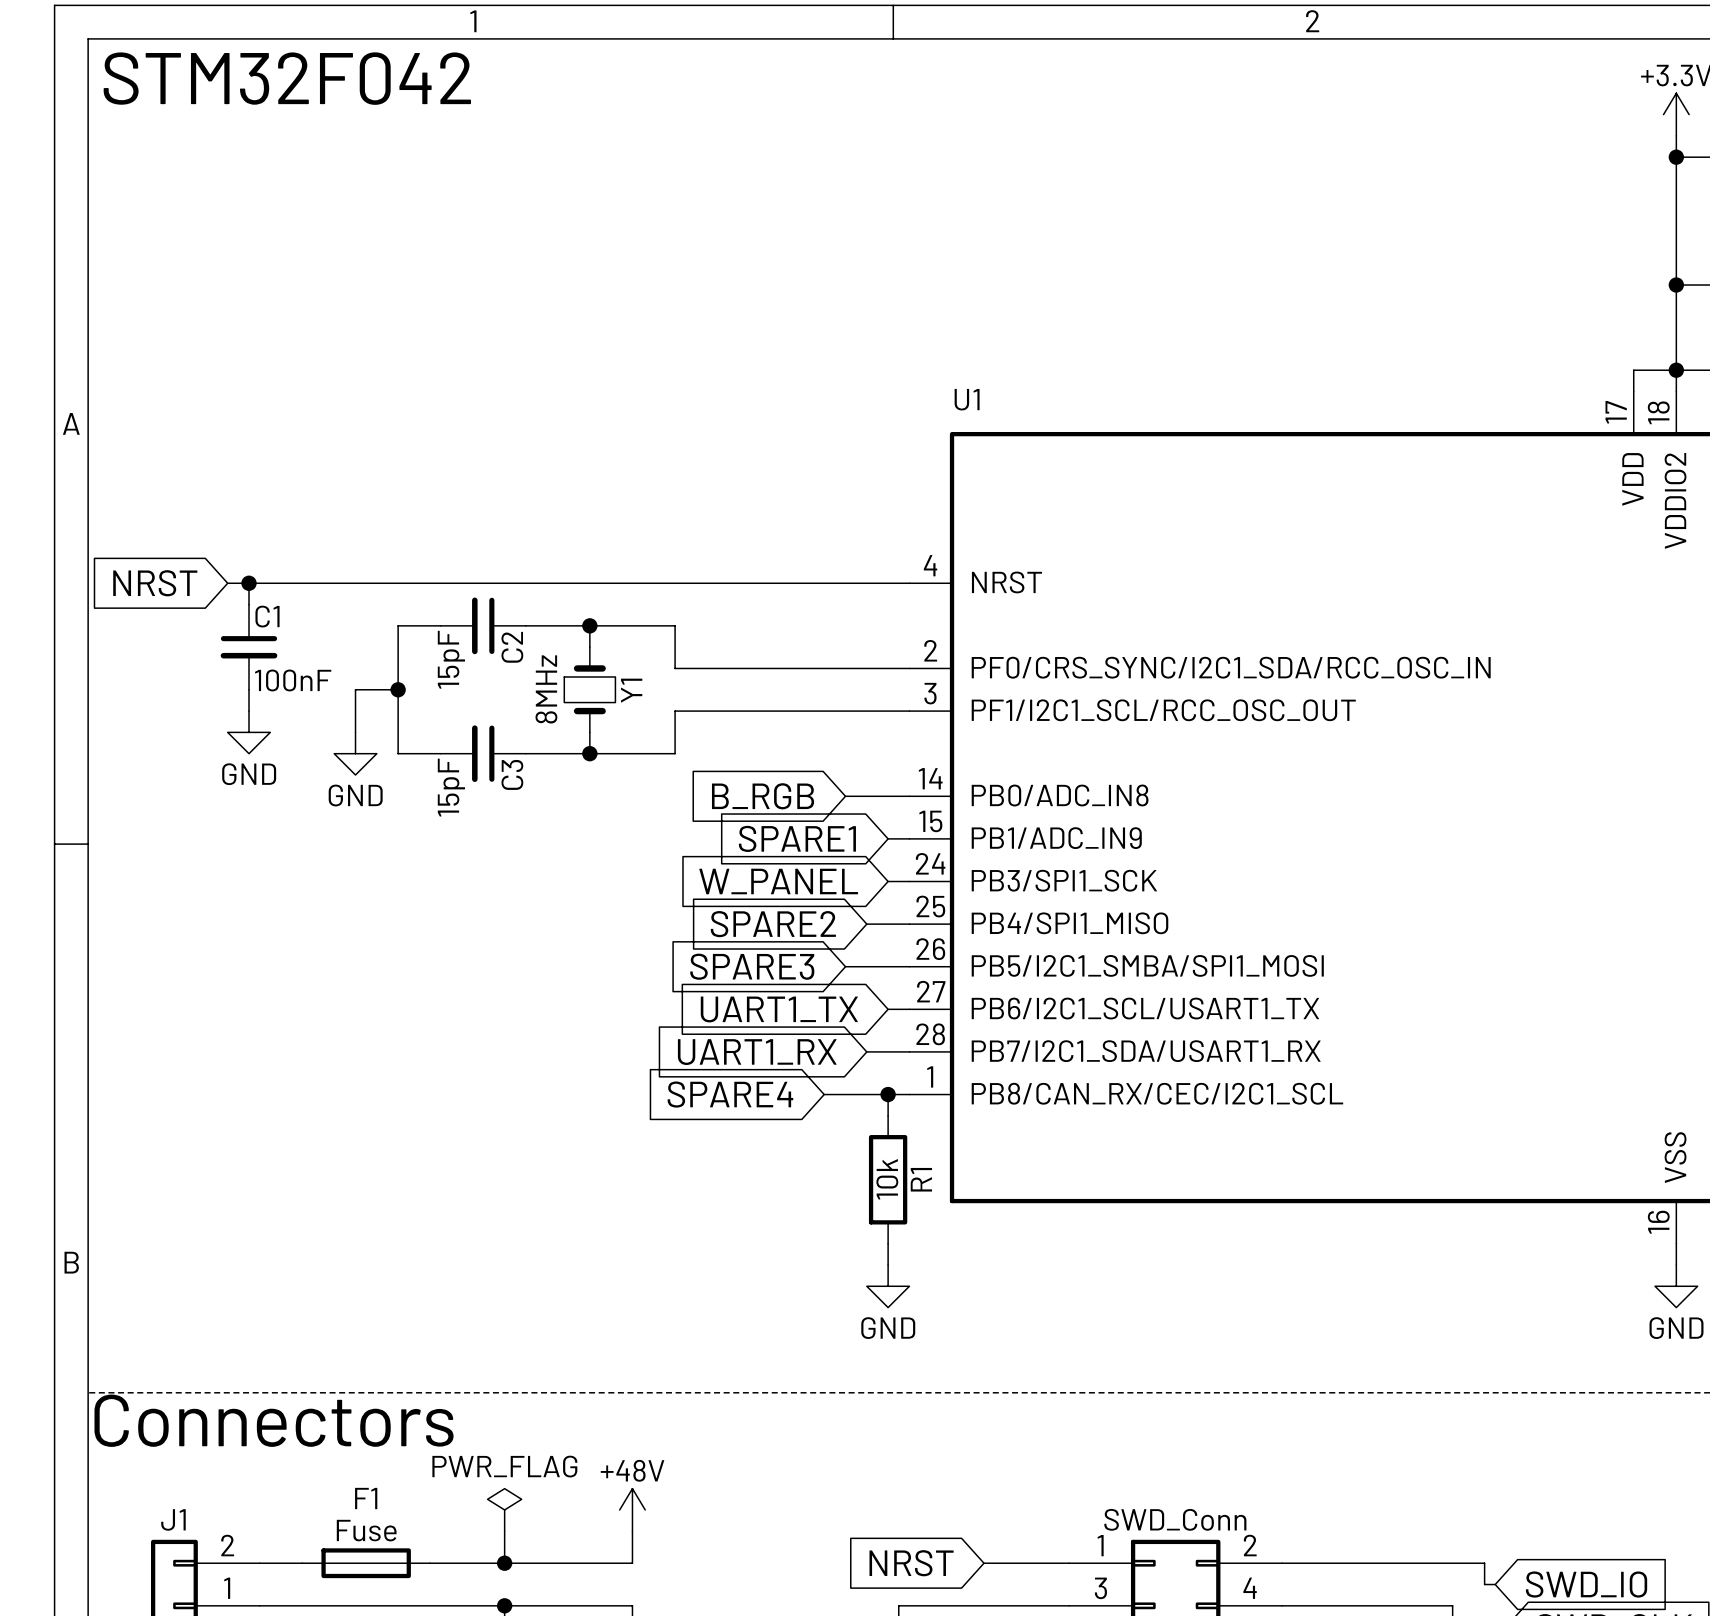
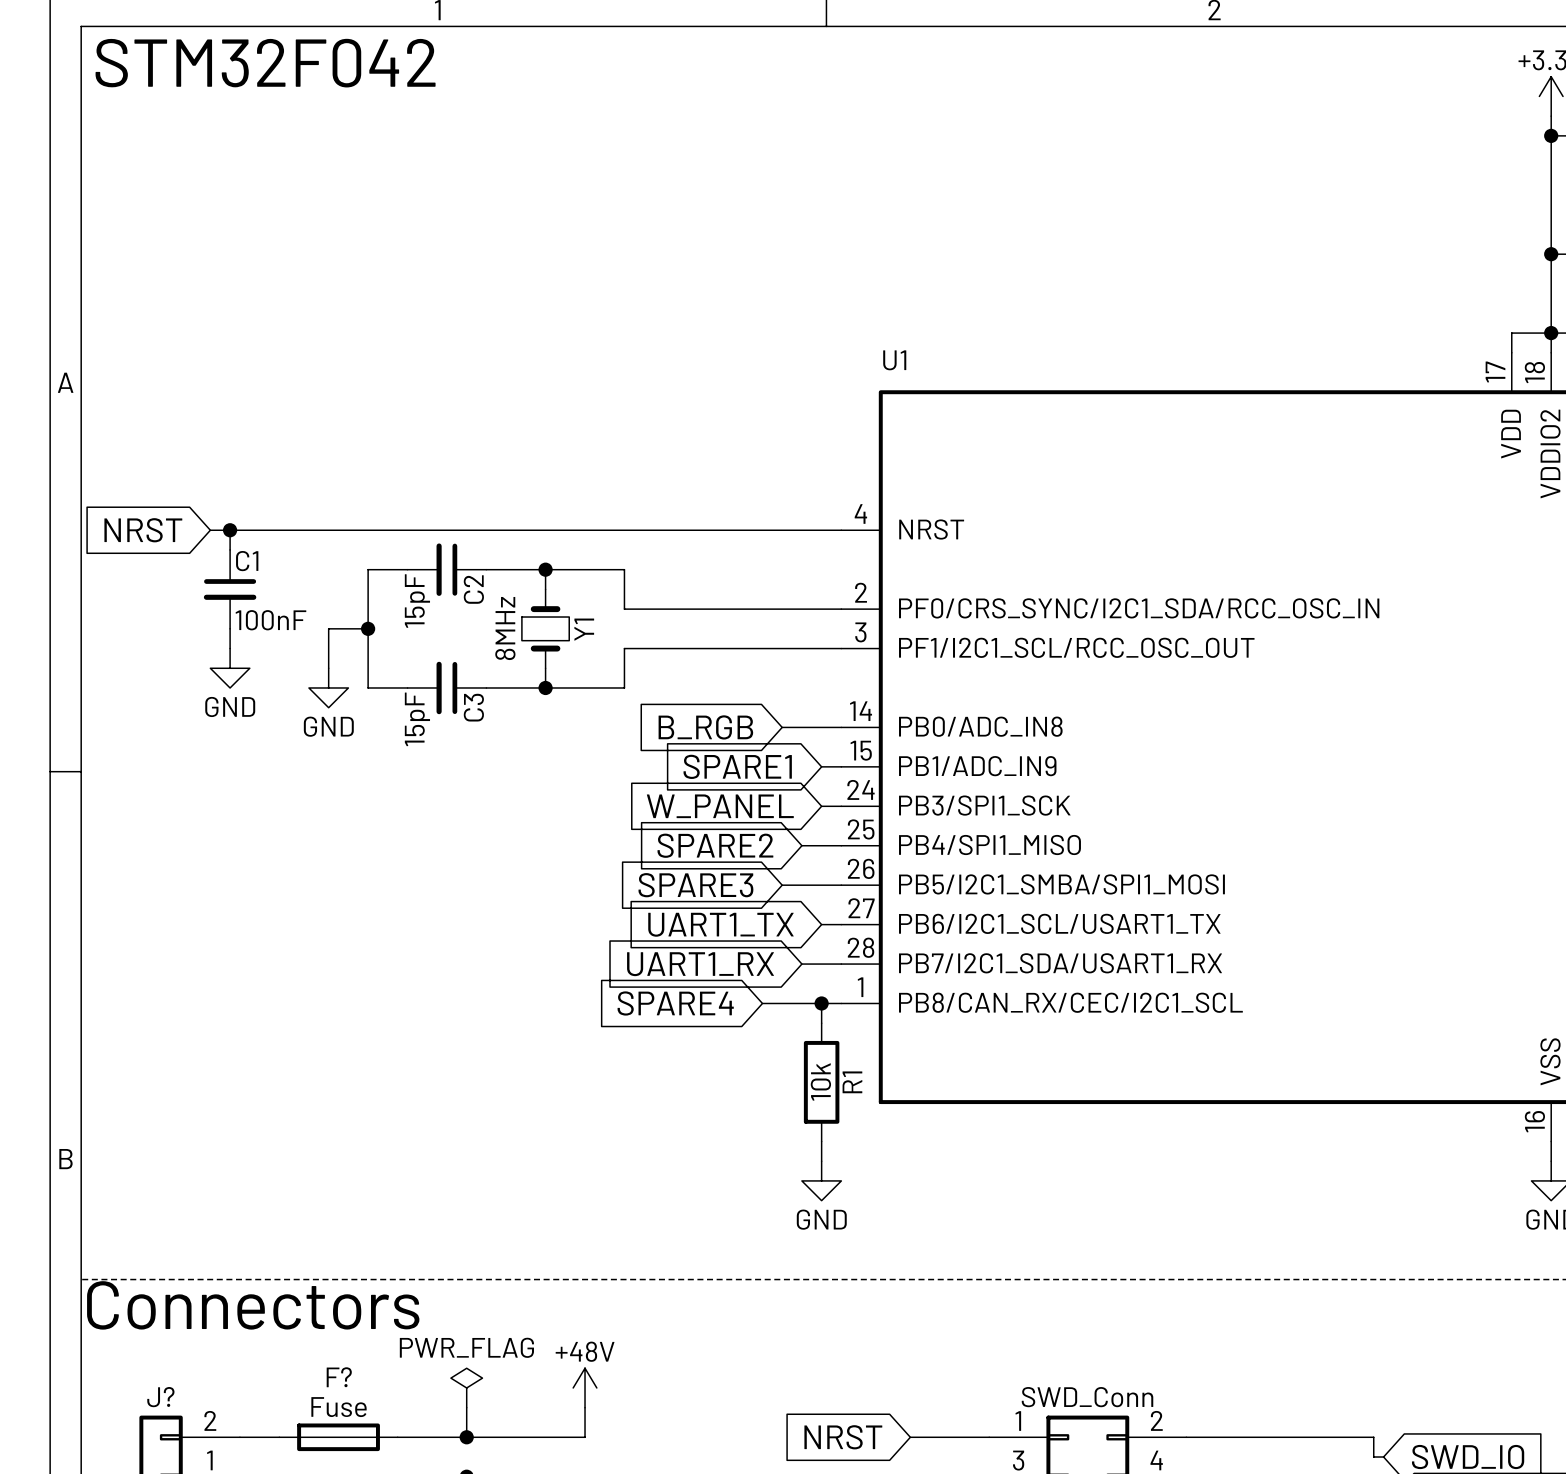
F1 name: F1 (366, 1498) -> F? (339, 1377)
J1 name: J1 (173, 1519) -> J? (160, 1397)

